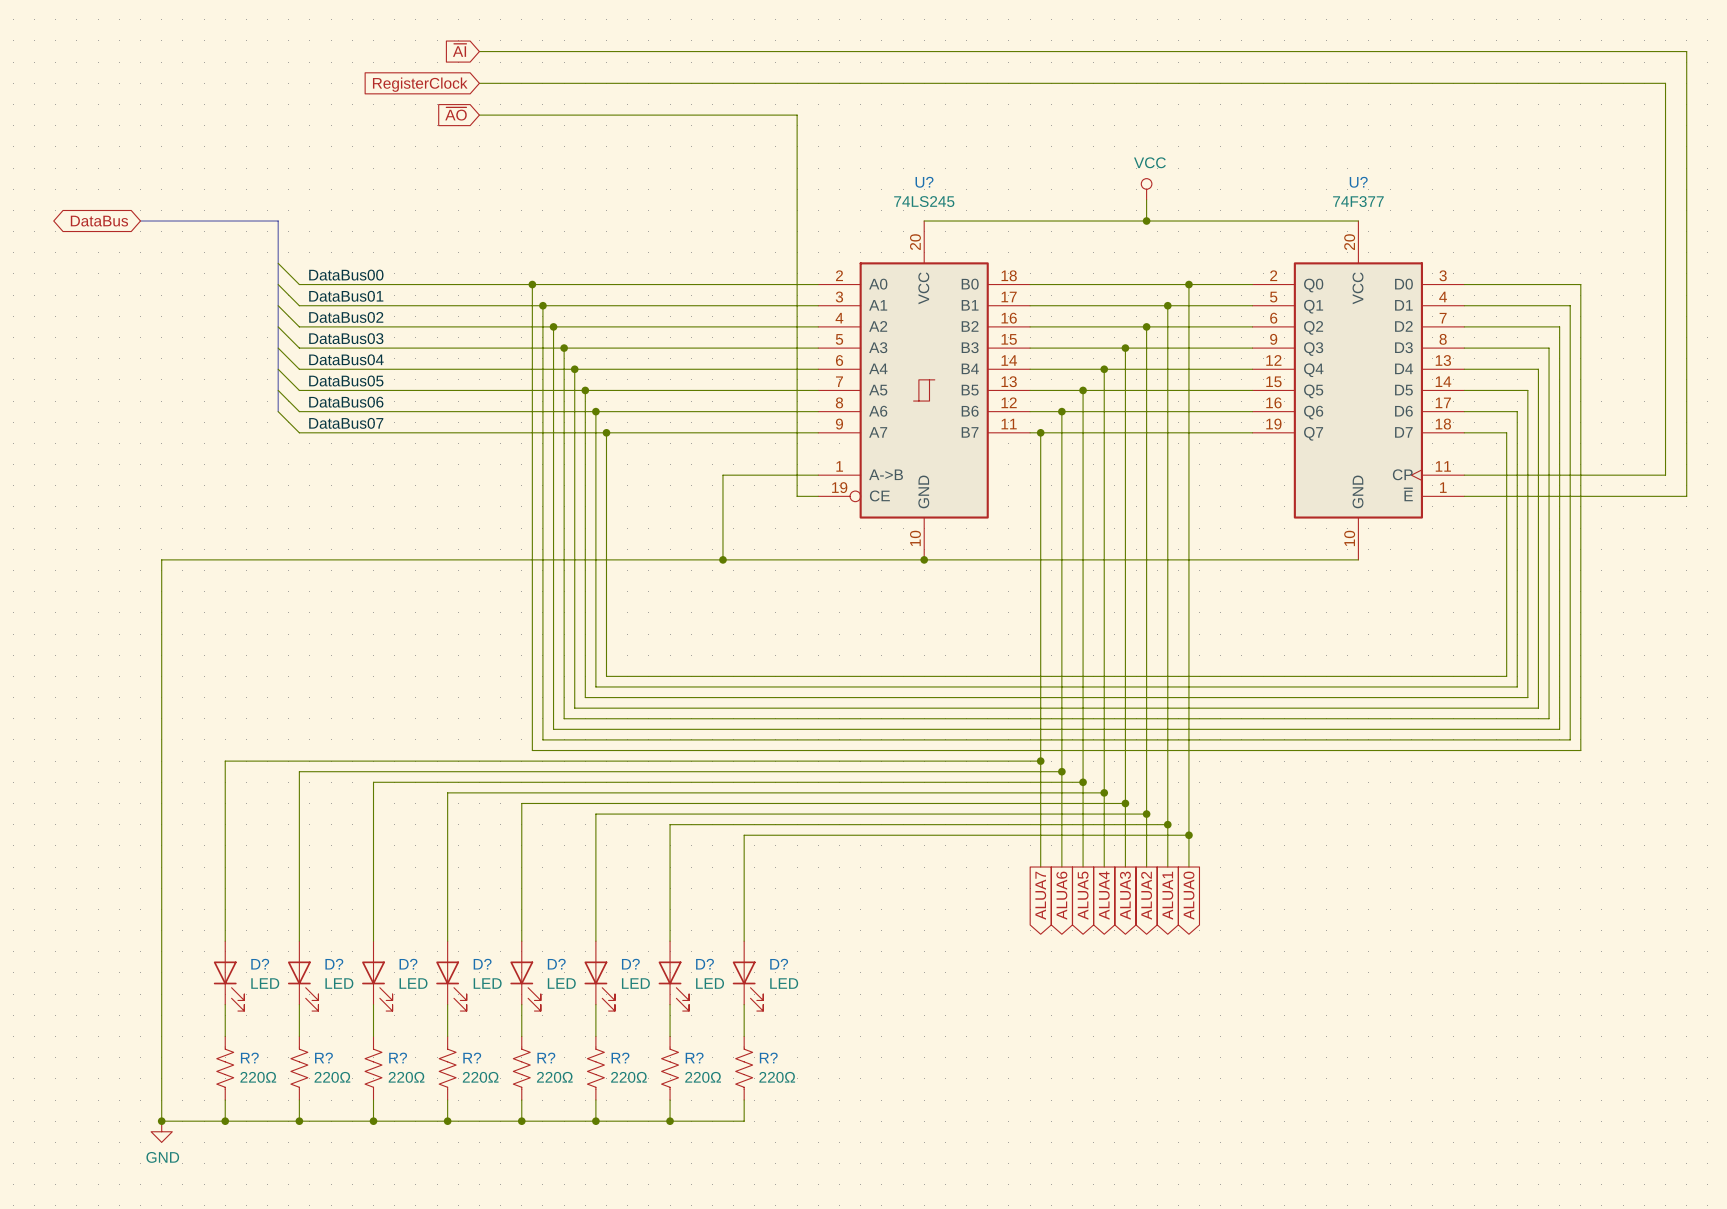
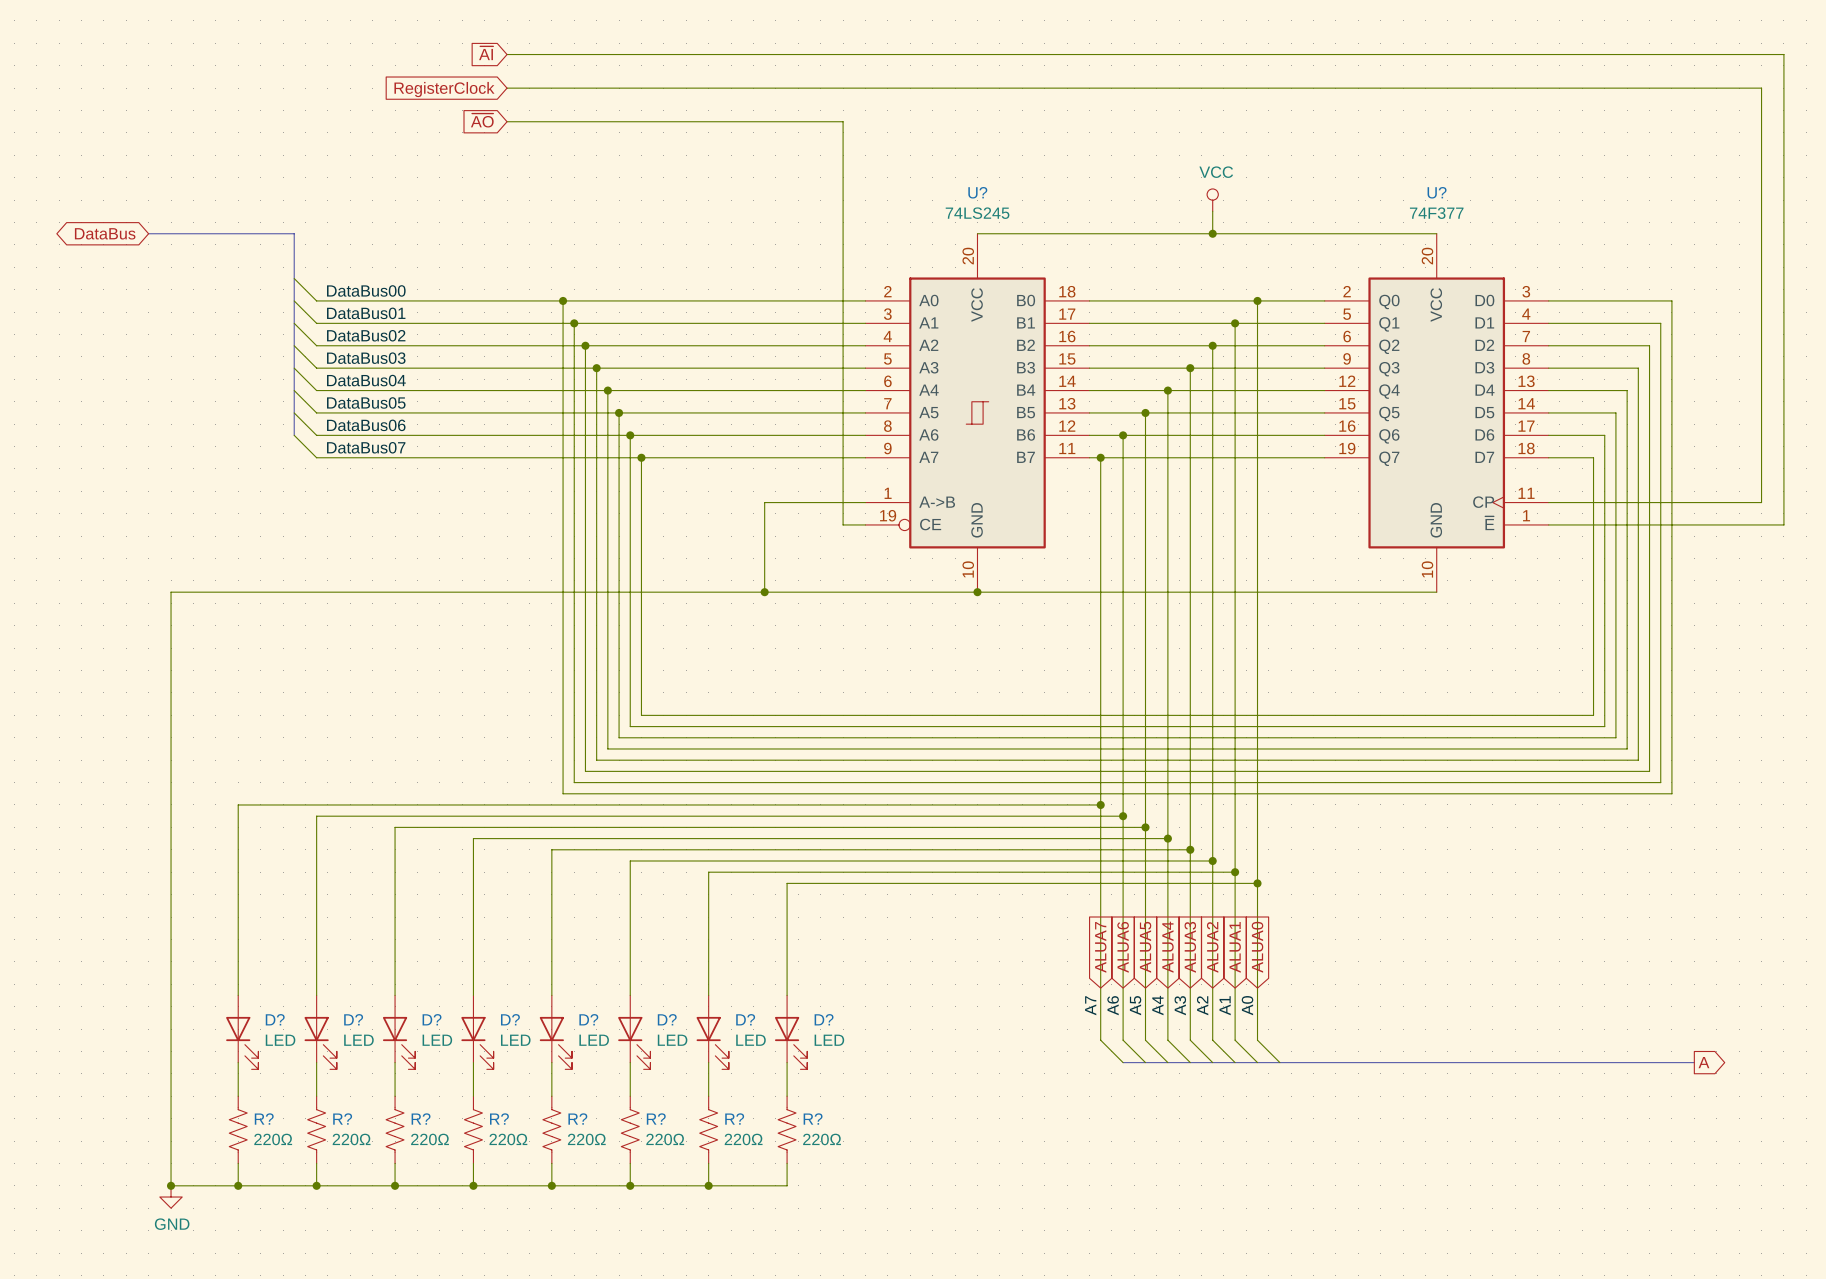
wire: none -> (1100, 917) (1100, 1040) (1123, 1062)
wire: none -> (1123, 917) (1123, 1040) (1145, 1062)
wire: none -> (1145, 917) (1145, 1040) (1167, 1062)
wire: none -> (1167, 917) (1167, 1040) (1190, 1062)
wire: none -> (1190, 917) (1190, 1040) (1212, 1062)
wire: none -> (1212, 917) (1212, 1040) (1235, 1062)
wire: none -> (1235, 917) (1235, 1040) (1257, 1062)
wire: none -> (1257, 917) (1257, 1040) (1279, 1062)
label: none -> A7 (1090, 1005)
label: none -> A6 (1113, 1005)
label: none -> A5 (1135, 1005)
label: none -> A4 (1157, 1005)
label: none -> A3 (1180, 1005)
label: none -> A2 (1202, 1005)
label: none -> A1 (1225, 1005)
label: none -> A0 (1247, 1005)
bus: none -> (1123, 1062) (1694, 1062)
global label: none -> A (1703, 1062)

